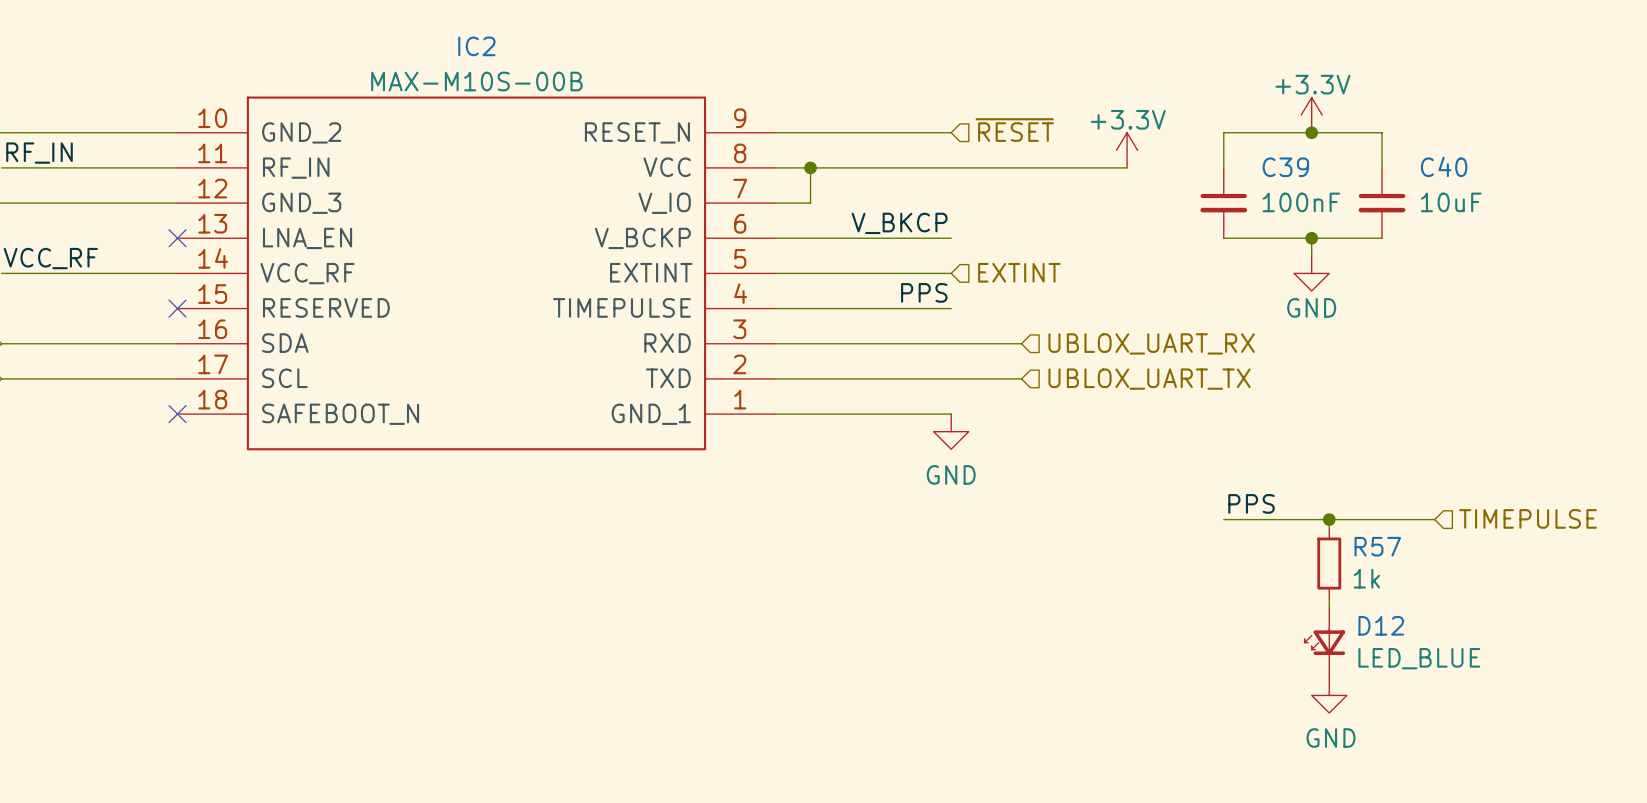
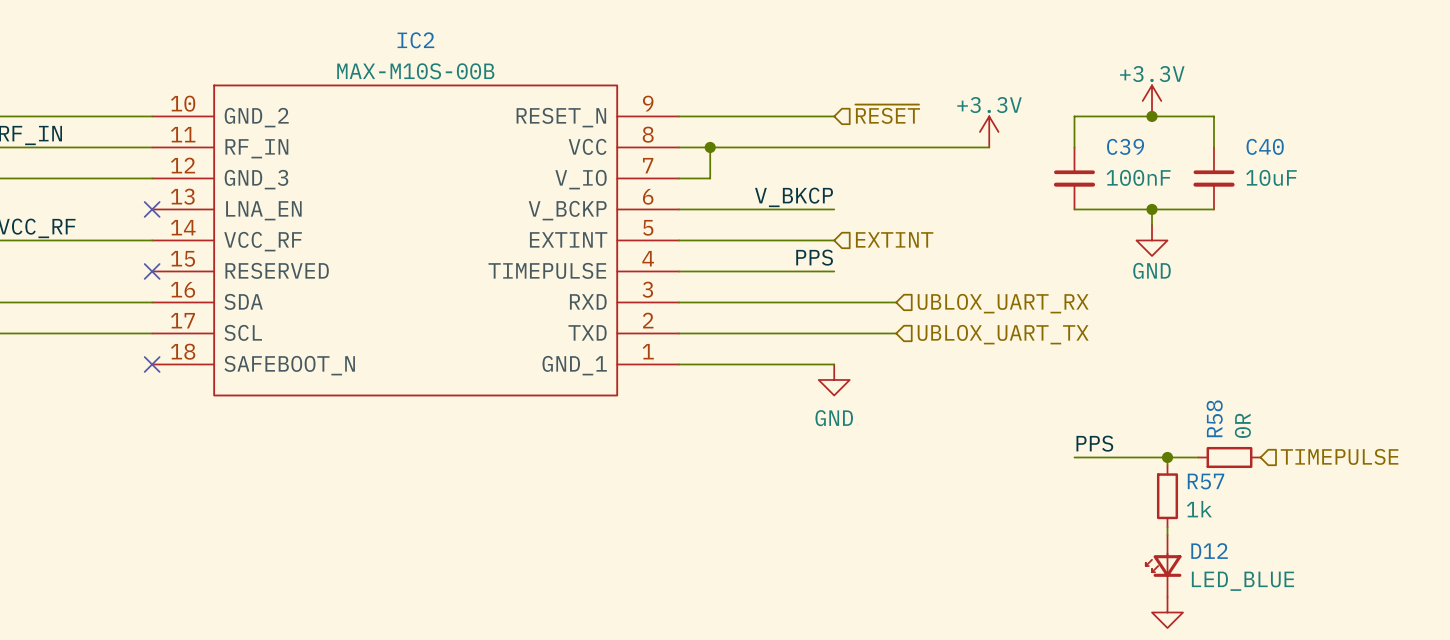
wire: (1364, 519) (1434, 519) -> none
R58: none -> 0R (1229, 457)

